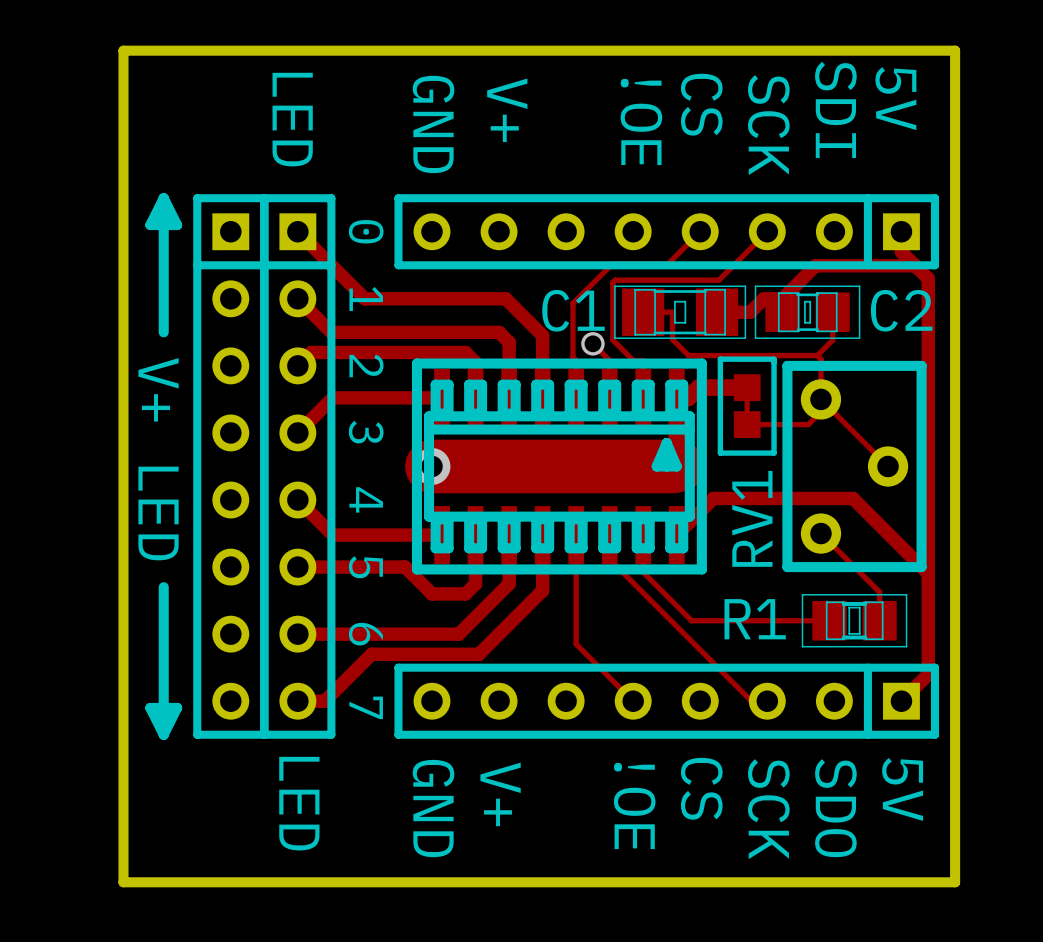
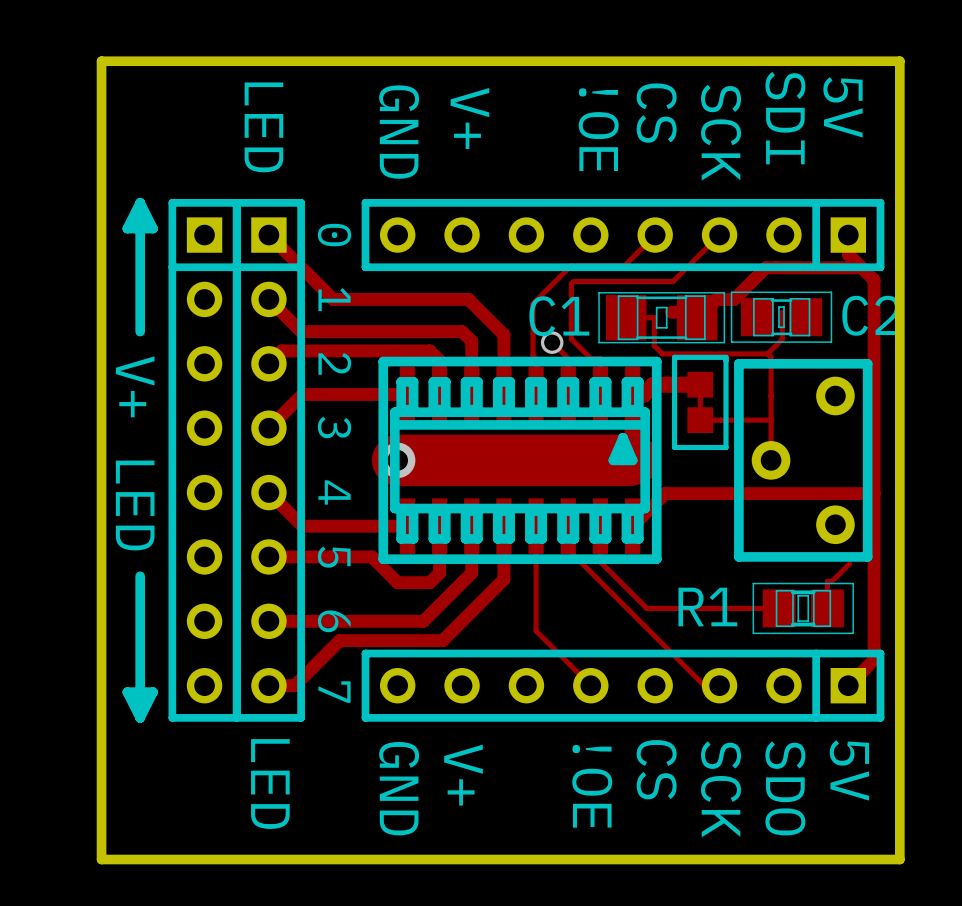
track: (643, 312) (672, 312) (672, 339) (688, 355) (707, 355) -> (626, 317) (654, 317) (654, 345) (662, 353)
C1 position: (680, 312) -> (661, 317)
C2 position: (807, 312) -> (781, 317)
track: none -> (771, 408) (771, 460)
track: (808, 424) (820, 411) (833, 411) (888, 466) -> (758, 420) (771, 420)
RV1: (854, 466) -> none
part: none -> (803, 460)
track: (710, 501) (713, 498) (853, 498) (928, 573) -> (665, 493) (874, 493)
track: (820, 533) (879, 592) -> (849, 563) (831, 581) (827, 581)

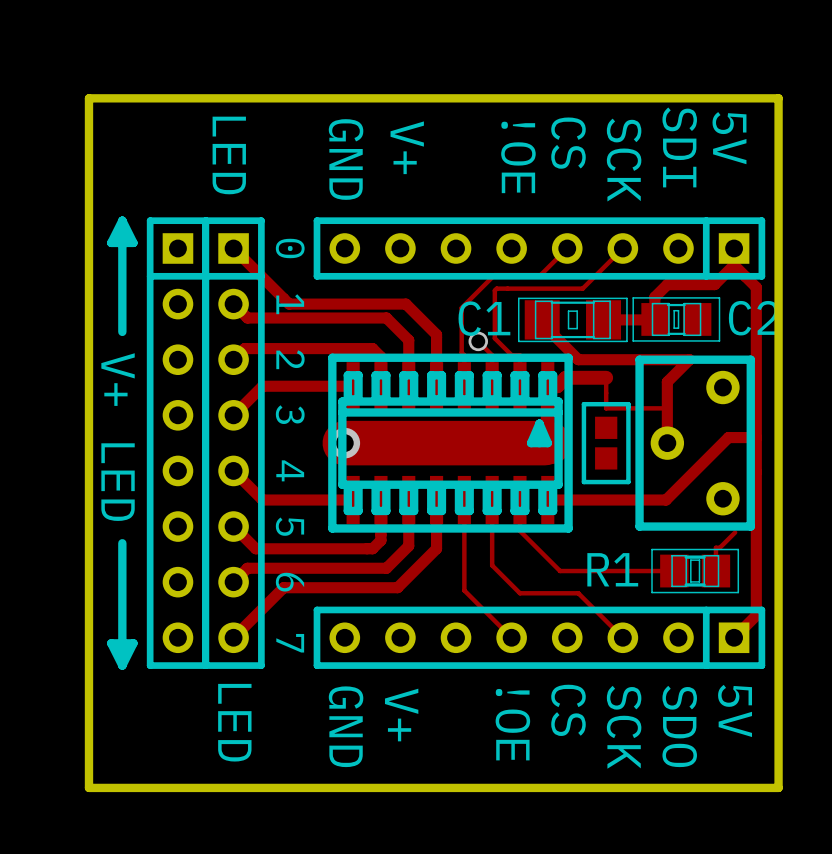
track: none -> (734, 265) (714, 284) (667, 284) (654, 297) (654, 320) (603, 319)
track: (861, 267) (765, 267) (734, 299) (716, 299) (703, 312) (671, 312) -> none
track: (782, 312) (782, 339) (767, 353) -> none
track: (285, 315) (301, 331) (462, 331) -> (247, 318) (386, 318) (400, 331)
track: (626, 317) (654, 317) (654, 345) (662, 353) (767, 353) -> (542, 319) (542, 323) (578, 359) (689, 359) (667, 381)
track: (767, 353) (771, 357) (771, 389) -> none
track width: thin (771, 389) (771, 460) -> thick (667, 381) (667, 443)
part position: (700, 402) -> (606, 443)
track: (874, 493) (665, 493) (632, 526) -> (756, 437) (728, 437) (666, 500) (547, 500)
track: (568, 549) (704, 685) (719, 685) -> (492, 520) (492, 565) (519, 593) (578, 593) (622, 637)
track: (268, 556) (371, 556) (397, 582) -> (233, 526) (255, 548) (344, 548)
track: (471, 573) (423, 621) (268, 621) -> (408, 540) (408, 546) (386, 568) (247, 568) (233, 582)
track: (503, 579) (442, 640) (339, 640) (294, 685) (268, 685) -> (436, 546) (436, 548) (397, 587) (283, 587) (233, 637)

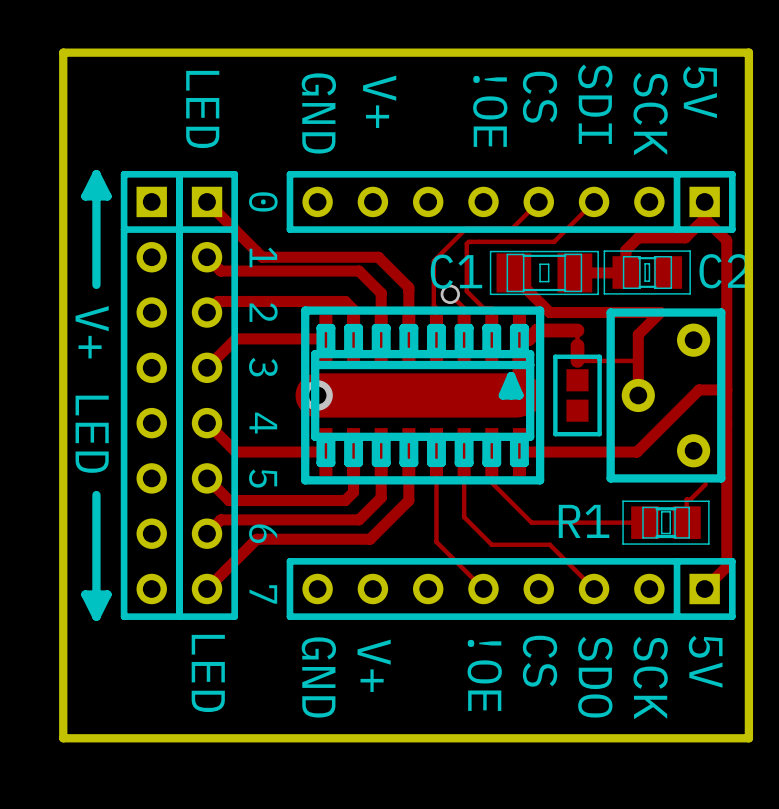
text position: SDI (679, 147) -> SDI (595, 104)
text position: SCK (624, 160) -> SCK (650, 114)
track width: thin (606, 393) (606, 408) -> thick (577, 345) (577, 360)
text: SDO (679, 726) -> SCK (650, 678)
text: SCK (624, 727) -> SDO (595, 677)

